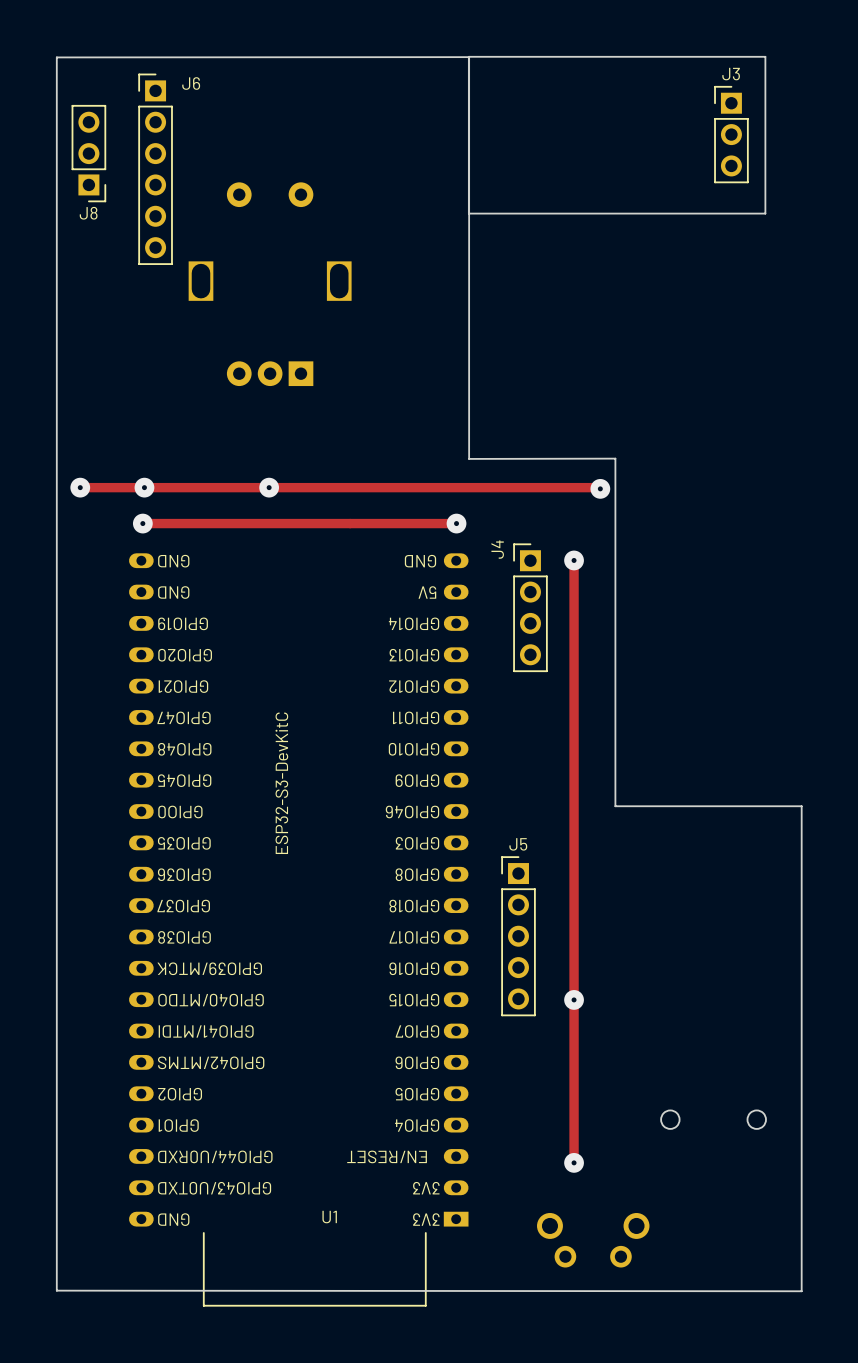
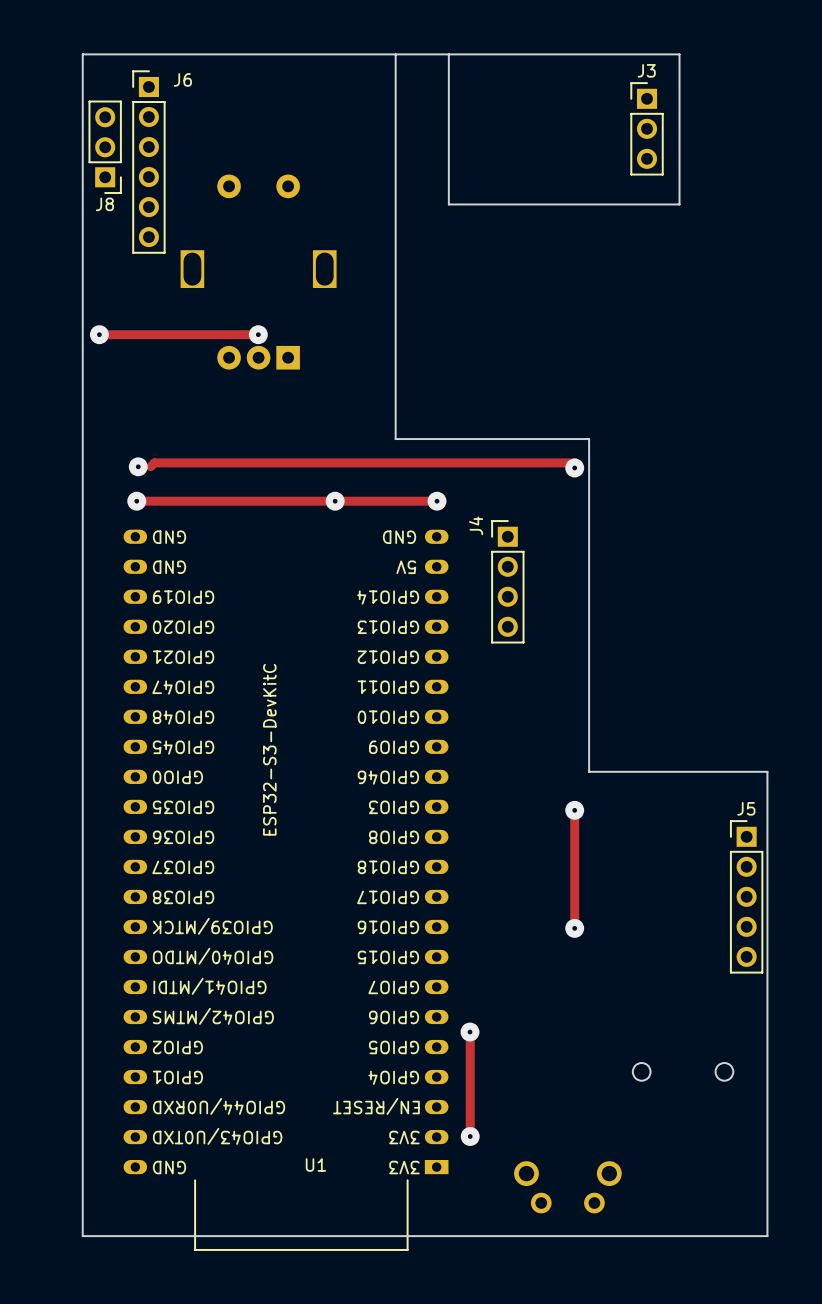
board edge: none -> (395, 54) (395, 439) (589, 439)
board edge: (709, 56) (765, 56) (765, 213) (709, 213) -> (679, 54) (679, 204)
J3 position: (731, 134) -> (647, 128)
J8 position: (88, 153) -> (105, 147)
track: none -> (99, 334) (258, 334)
via: none -> (99, 334)
via: none -> (258, 334)
board edge: (615, 458) (469, 458) (469, 57) (56, 57) (56, 1290) (801, 1291) -> (448, 54) (82, 54) (82, 1236) (767, 1236)
track: (601, 484) (600, 488) (80, 487) -> (575, 463) (154, 462) (150, 466)
via: (80, 487) -> none
via: (269, 487) -> none
via: none -> (335, 501)
track: (574, 560) (574, 1162) -> none
via: (574, 560) -> none
track: none -> (574, 810) (574, 928)
via: none -> (574, 810)
J5 position: (518, 936) -> (746, 896)
via position: (574, 999) -> (574, 928)
track: none -> (470, 1031) (470, 1136)
via: none -> (470, 1032)
via: (574, 1162) -> none
via: none -> (470, 1136)

